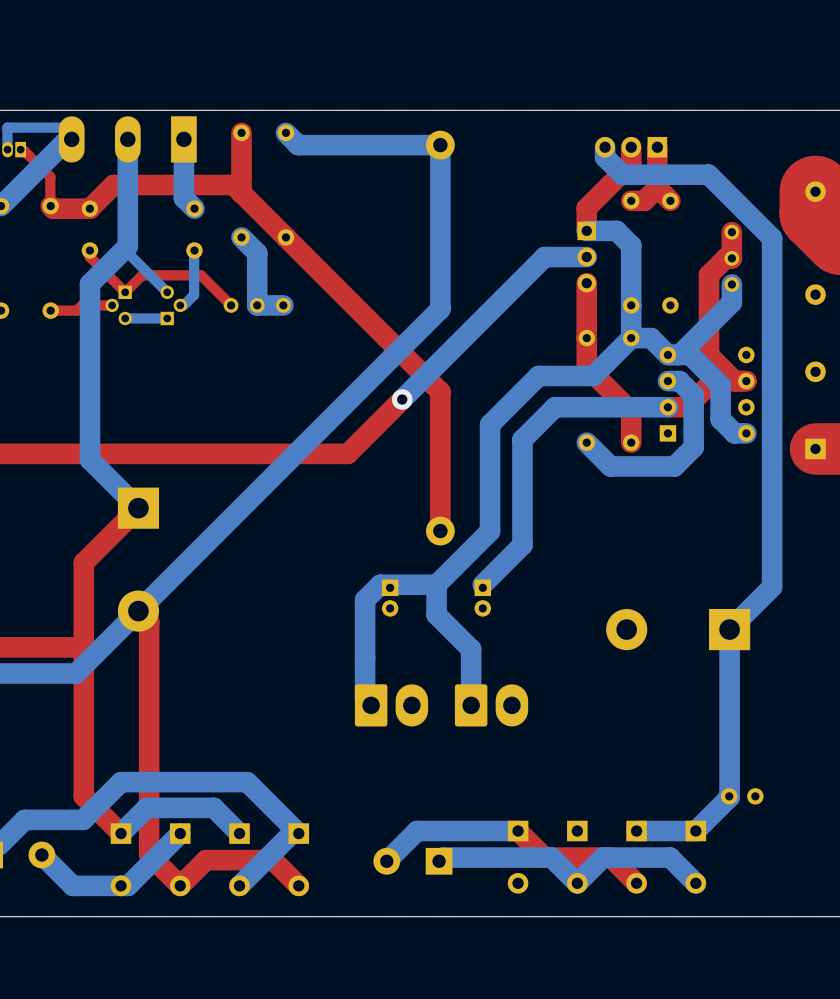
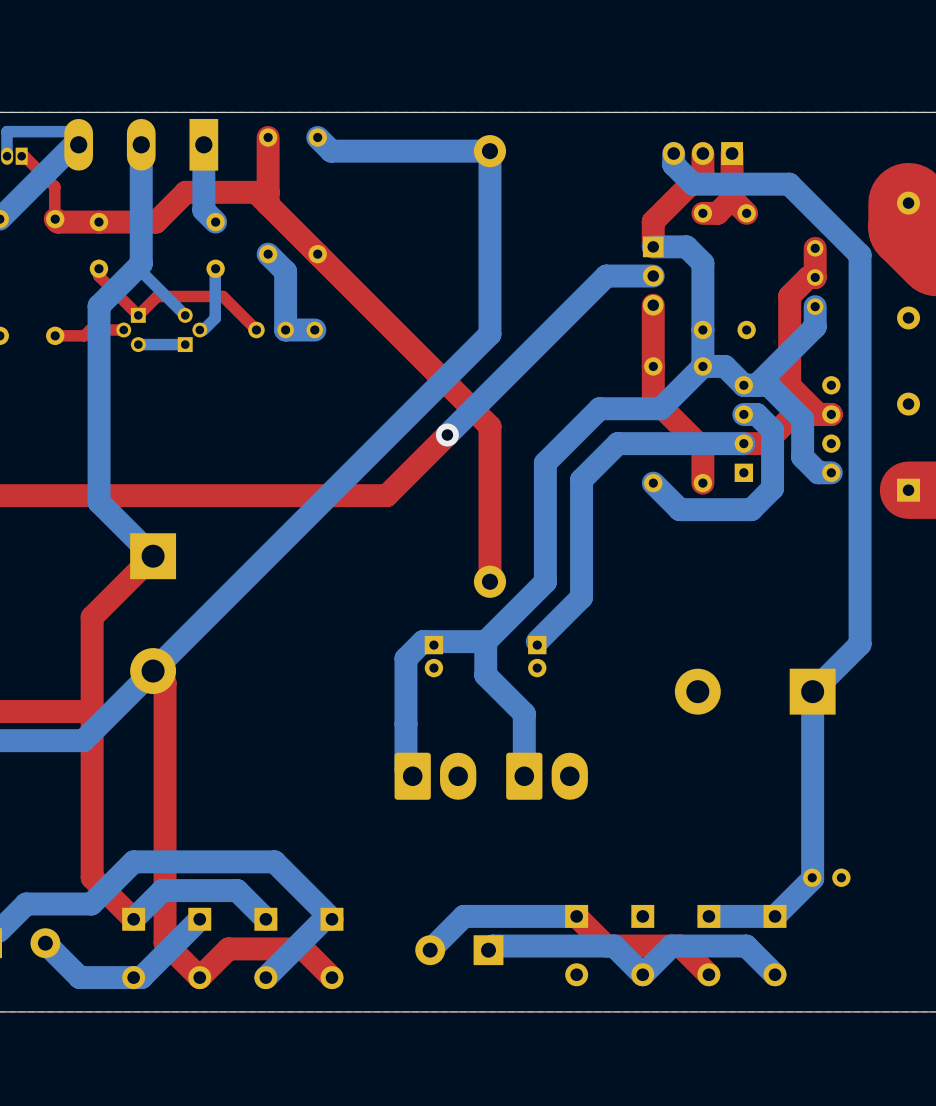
top track: none -> (268, 192) (185, 192) (156, 222) (99, 222)
top track: (233, 185) (113, 185) (89, 208) -> none

